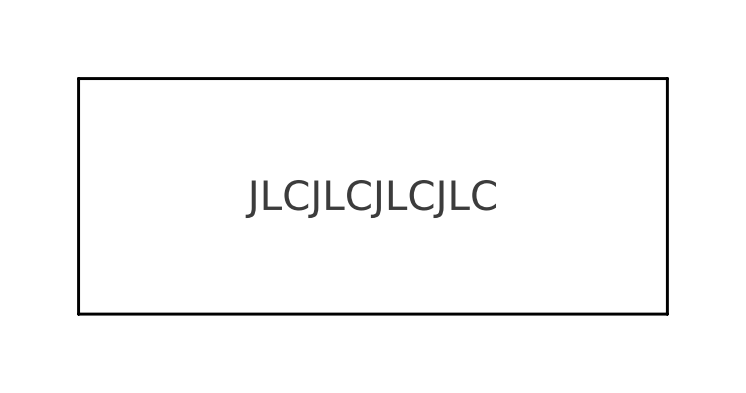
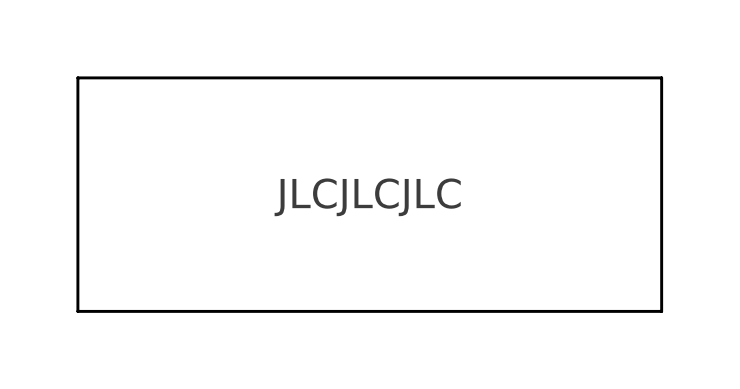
text: JLCJLCJLCJLC (370, 199) -> JLCJLCJLC (367, 197)

